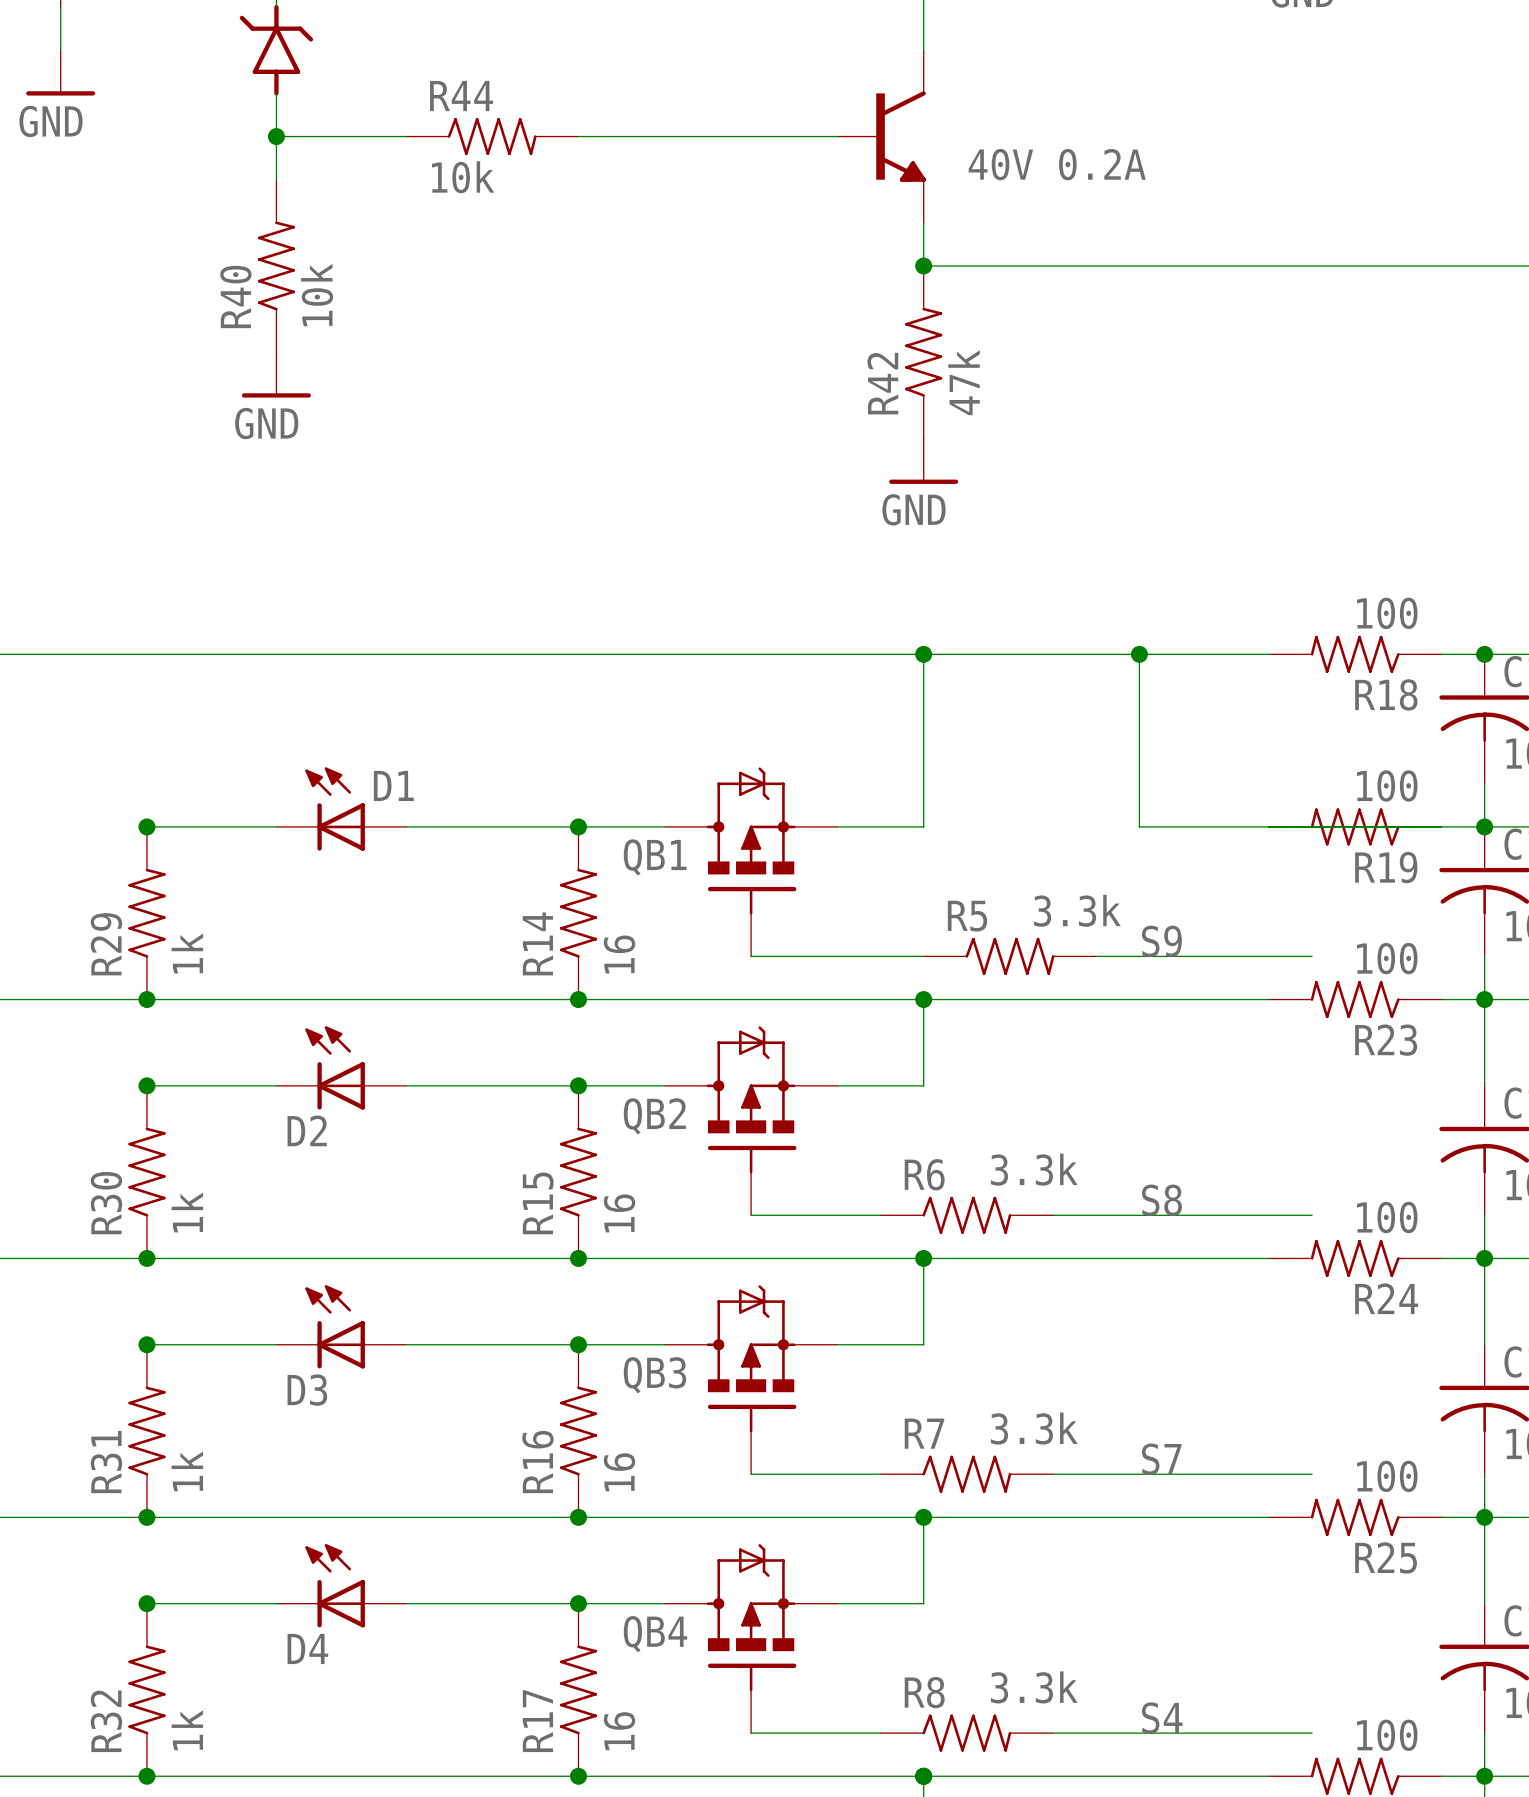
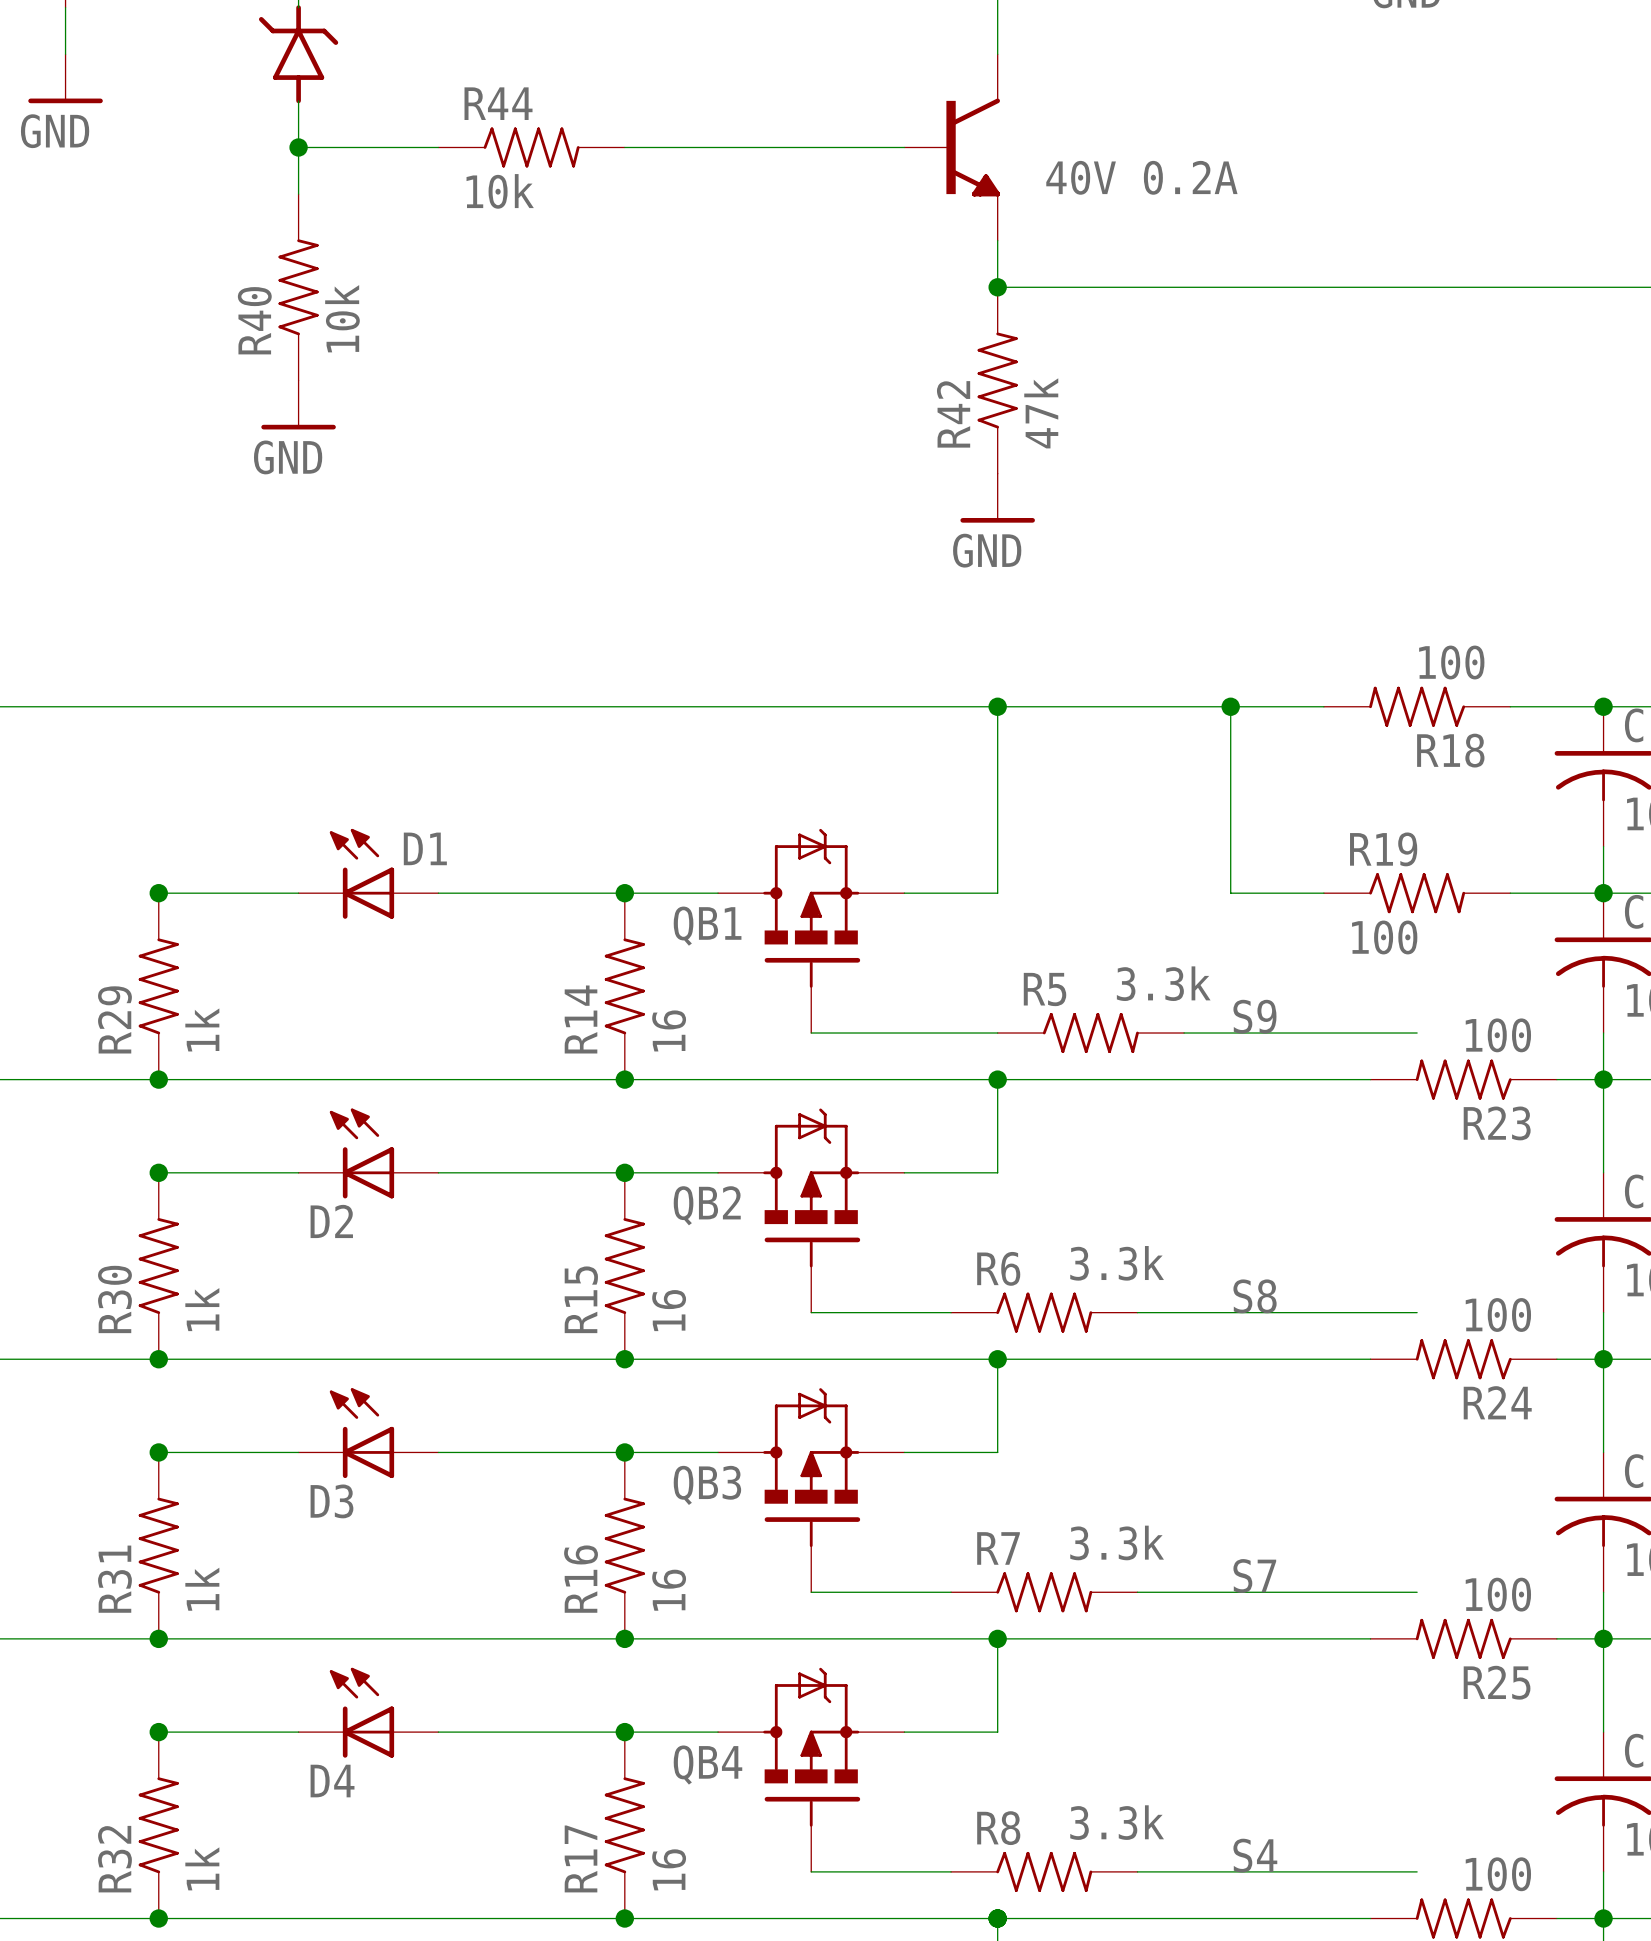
R18 position: (1355, 654) -> (1417, 706)
R19 rotation: 0° (1355, 826) -> 180° (1417, 893)

